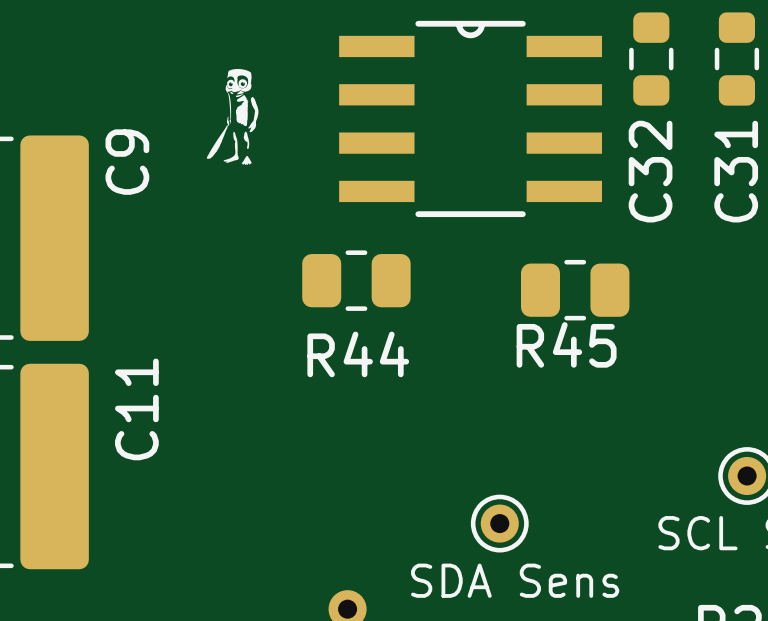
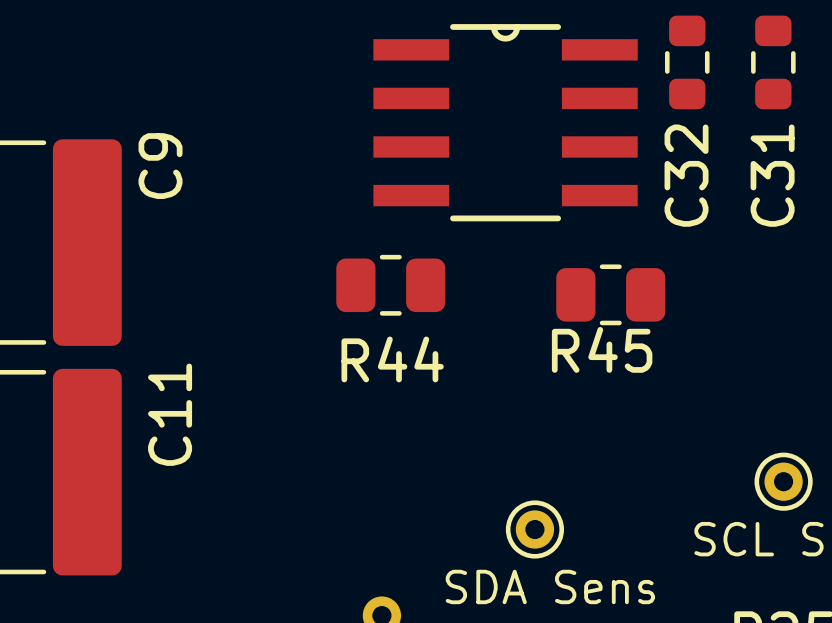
drawing: [206, 68, 259, 165] -> none

